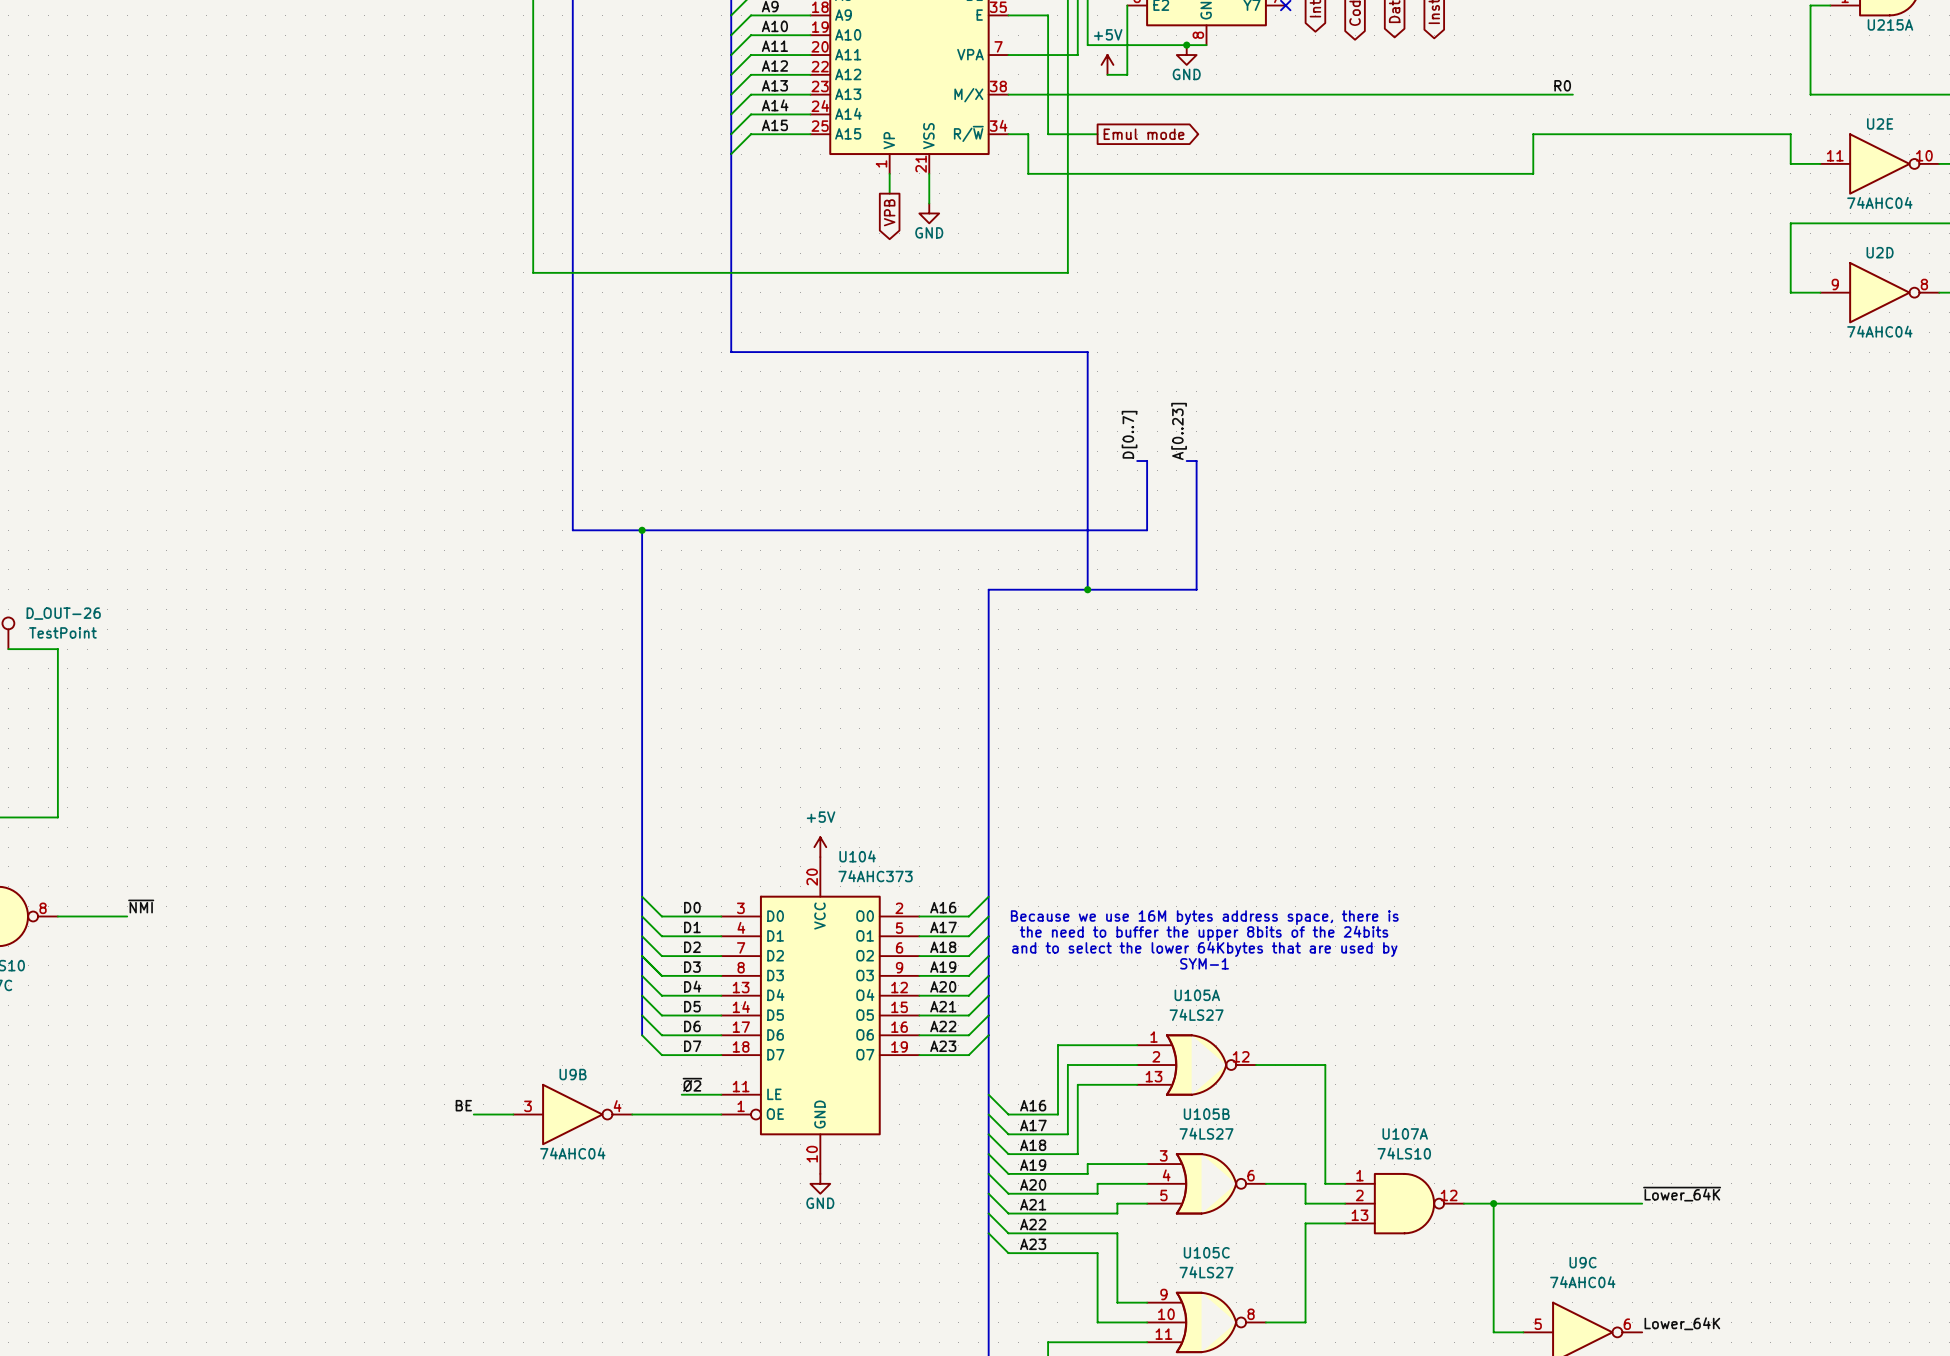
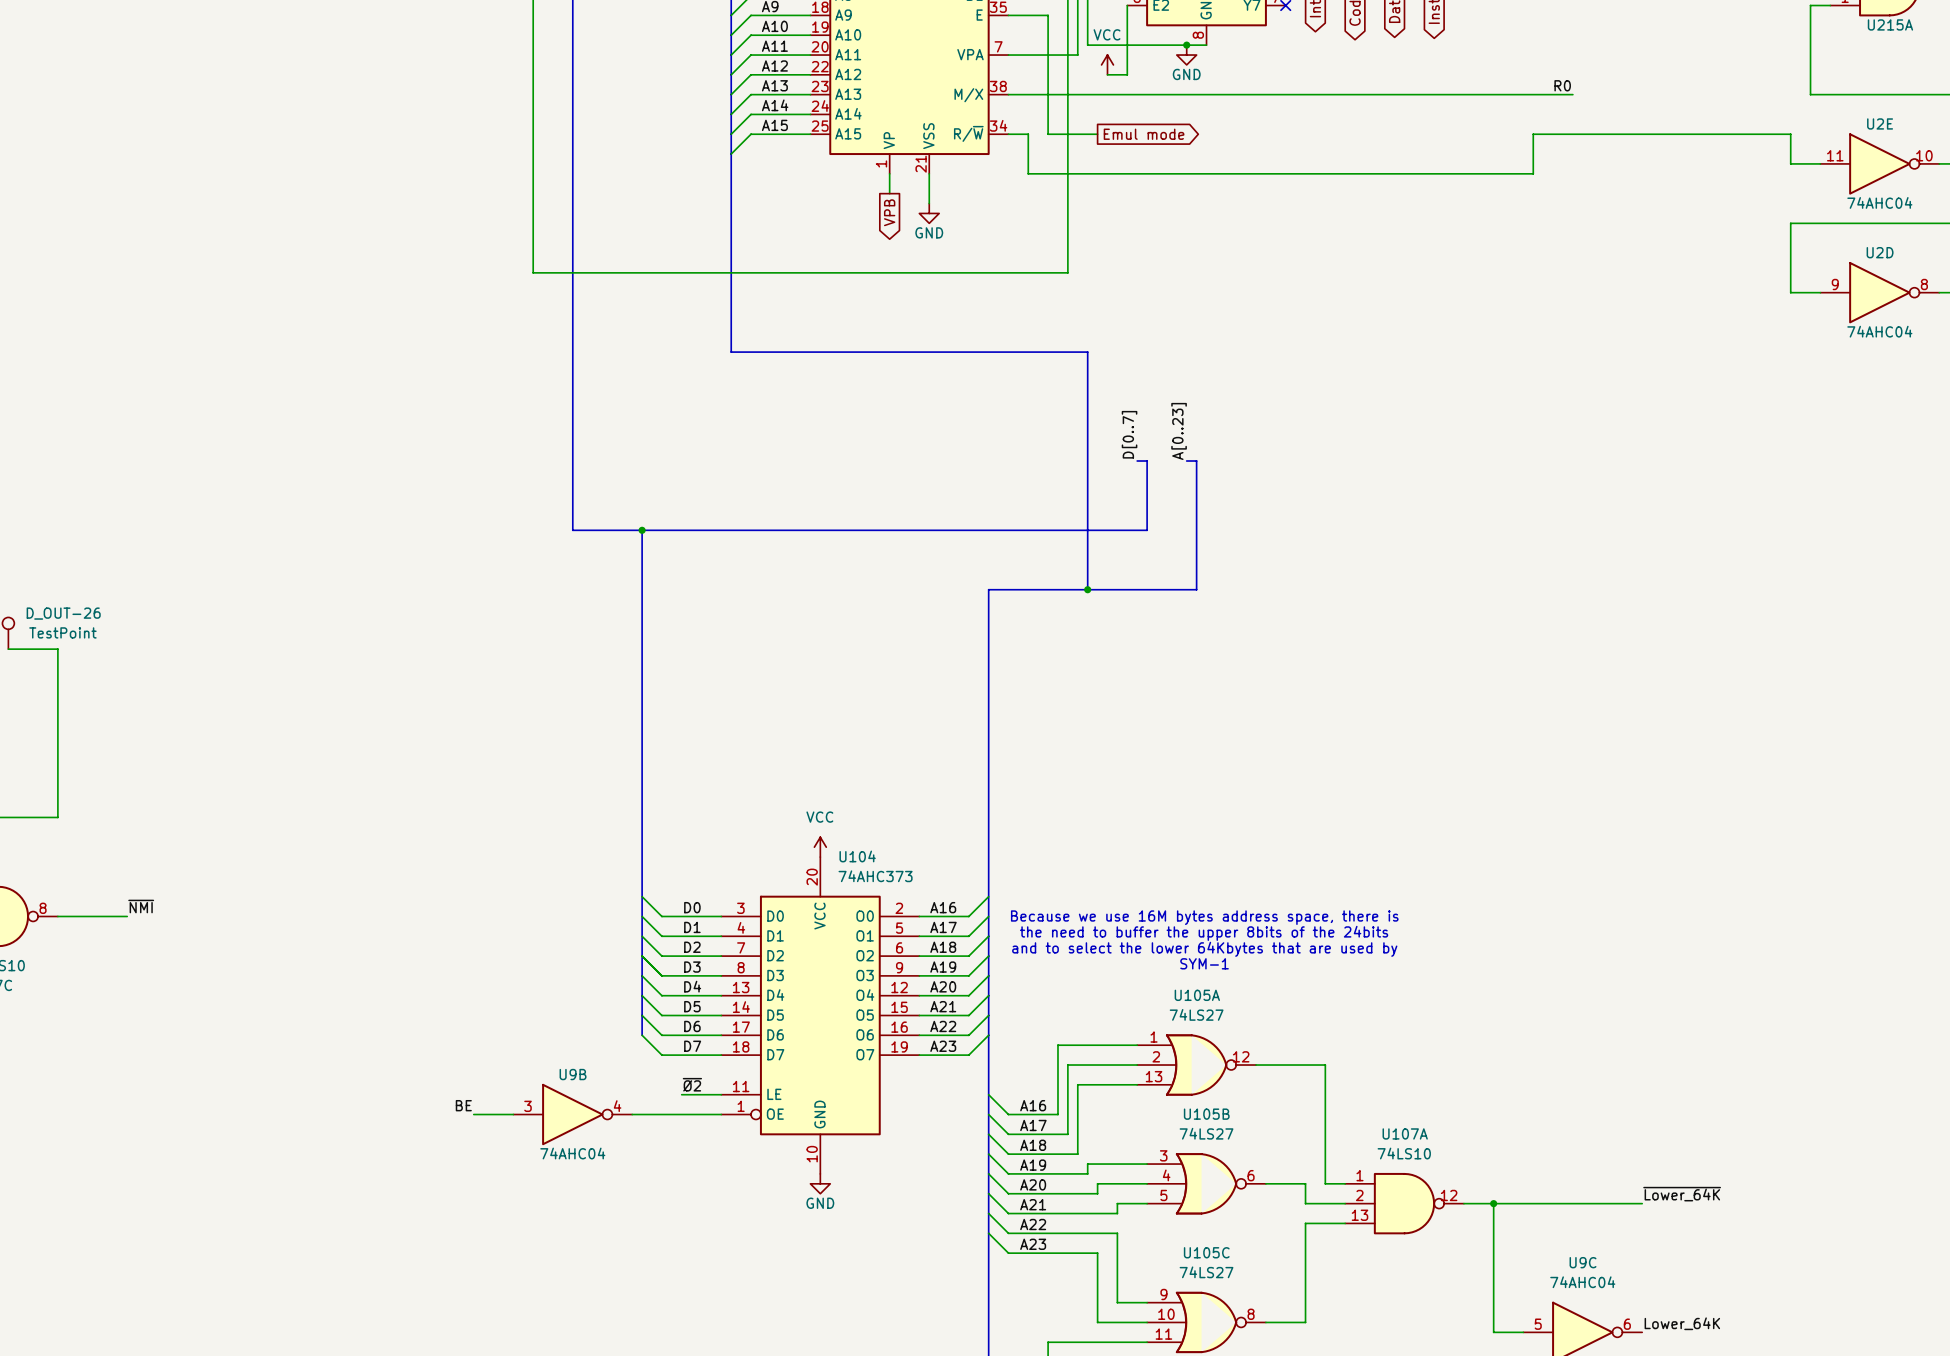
power symbol: +5V (1107, 64) -> VCC (1107, 64)
power symbol: +5V (820, 847) -> VCC (820, 847)

